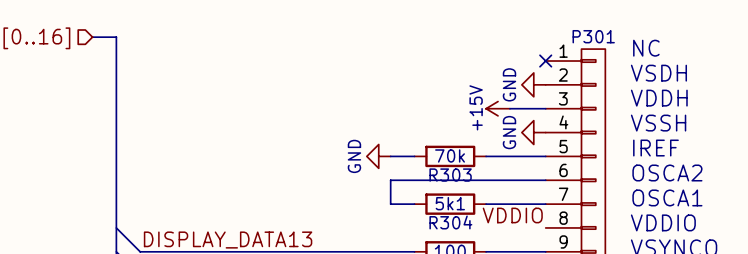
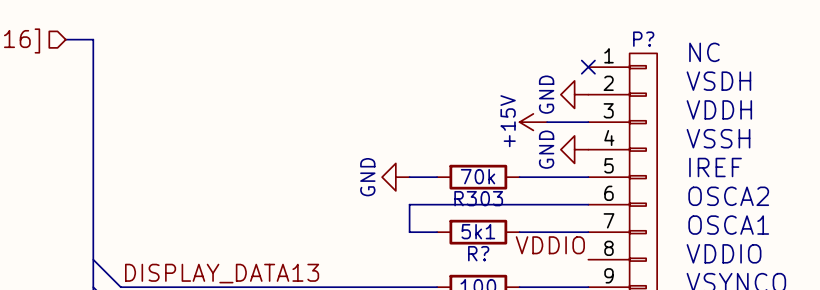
P301 name: P301 (593, 36) -> P? (643, 39)
R304 name: R304 (450, 222) -> R? (478, 253)

